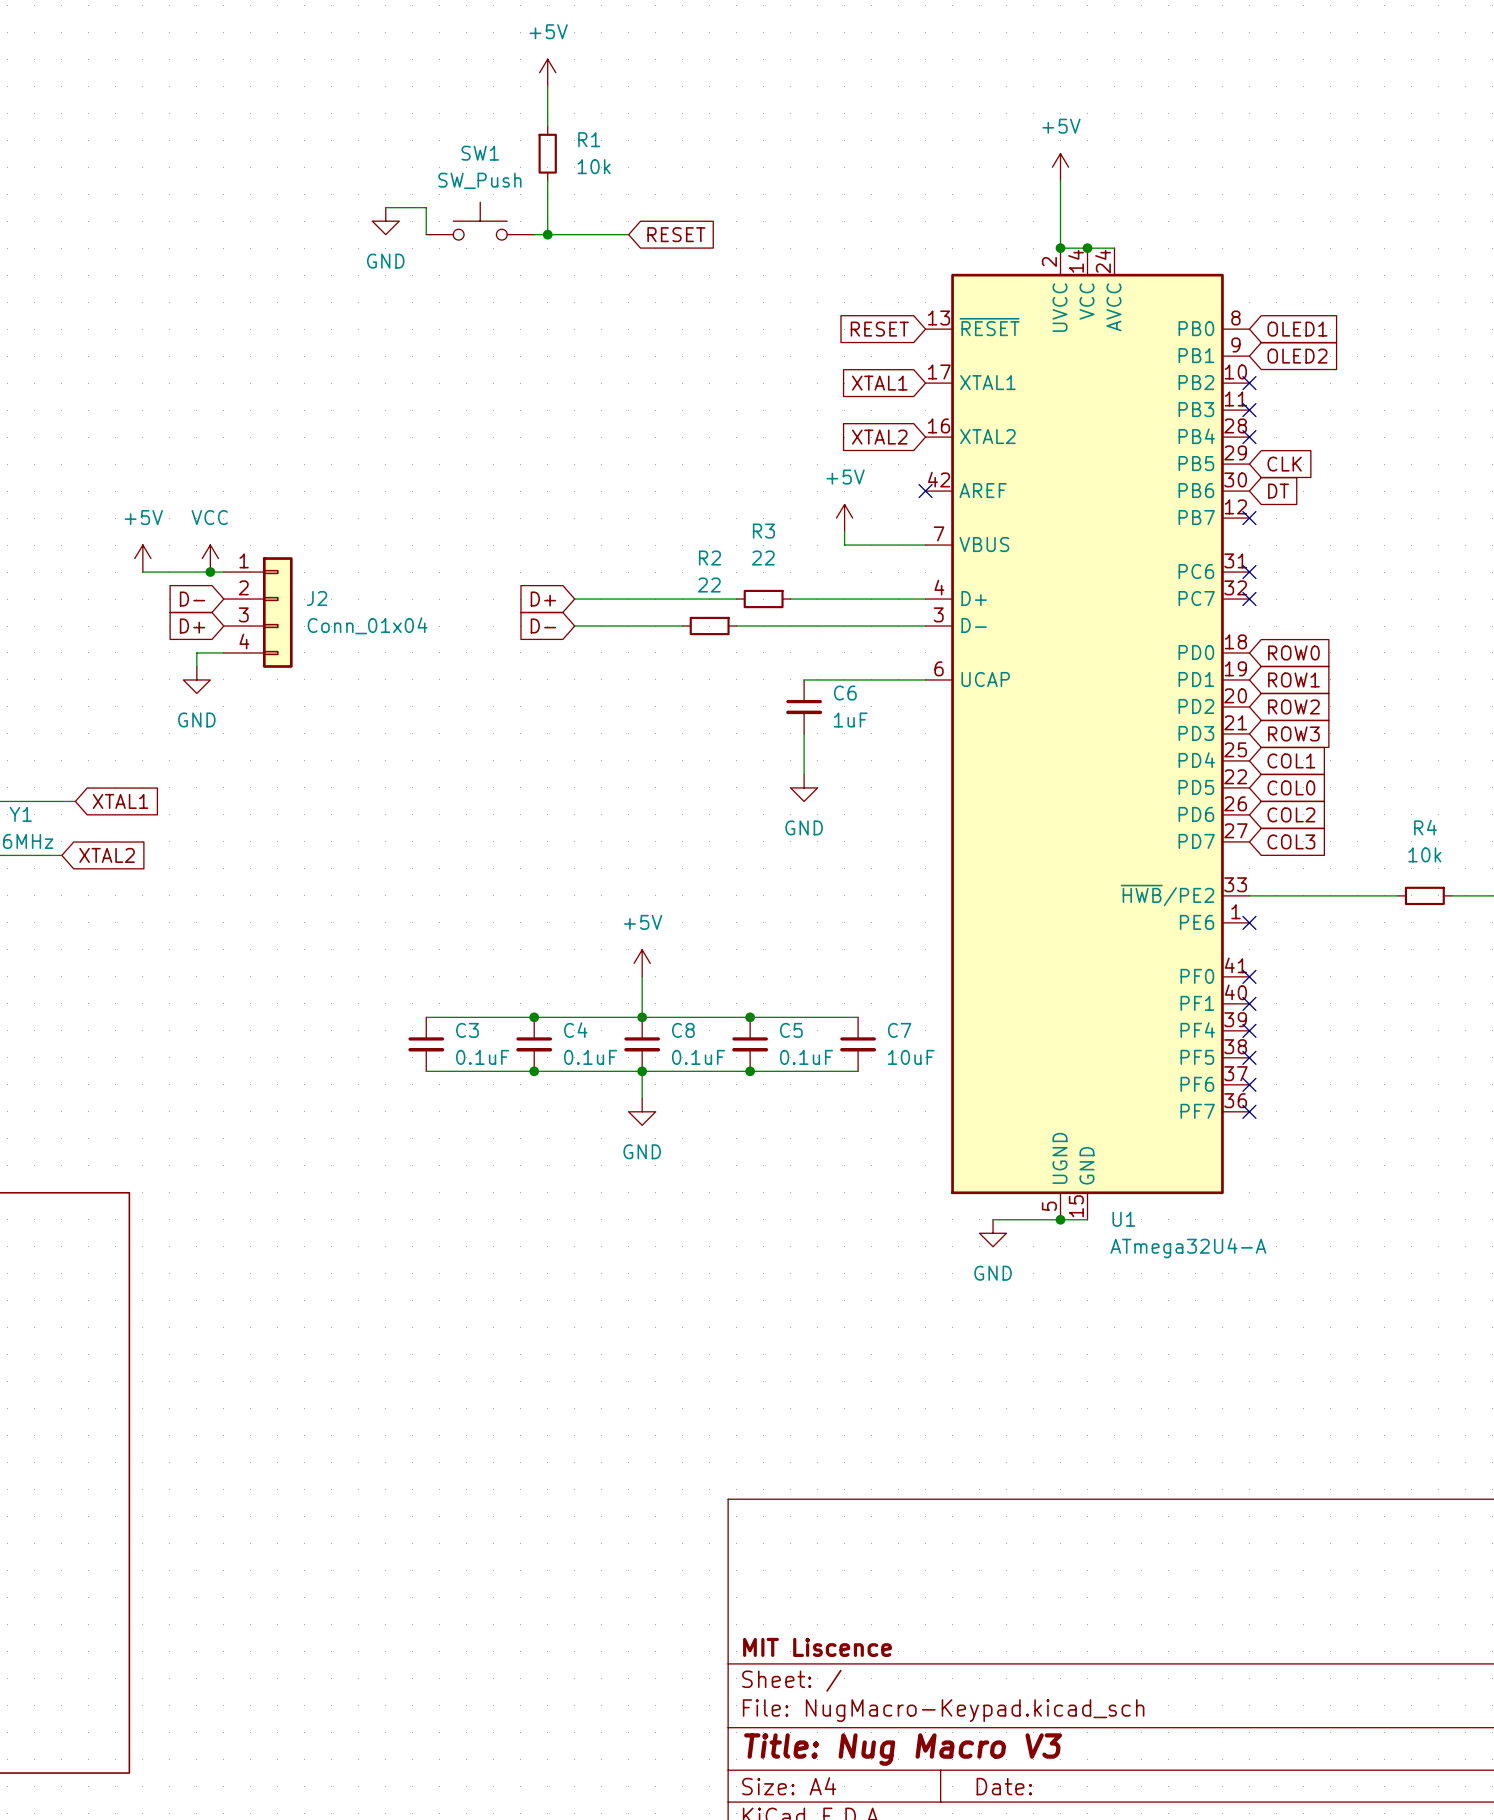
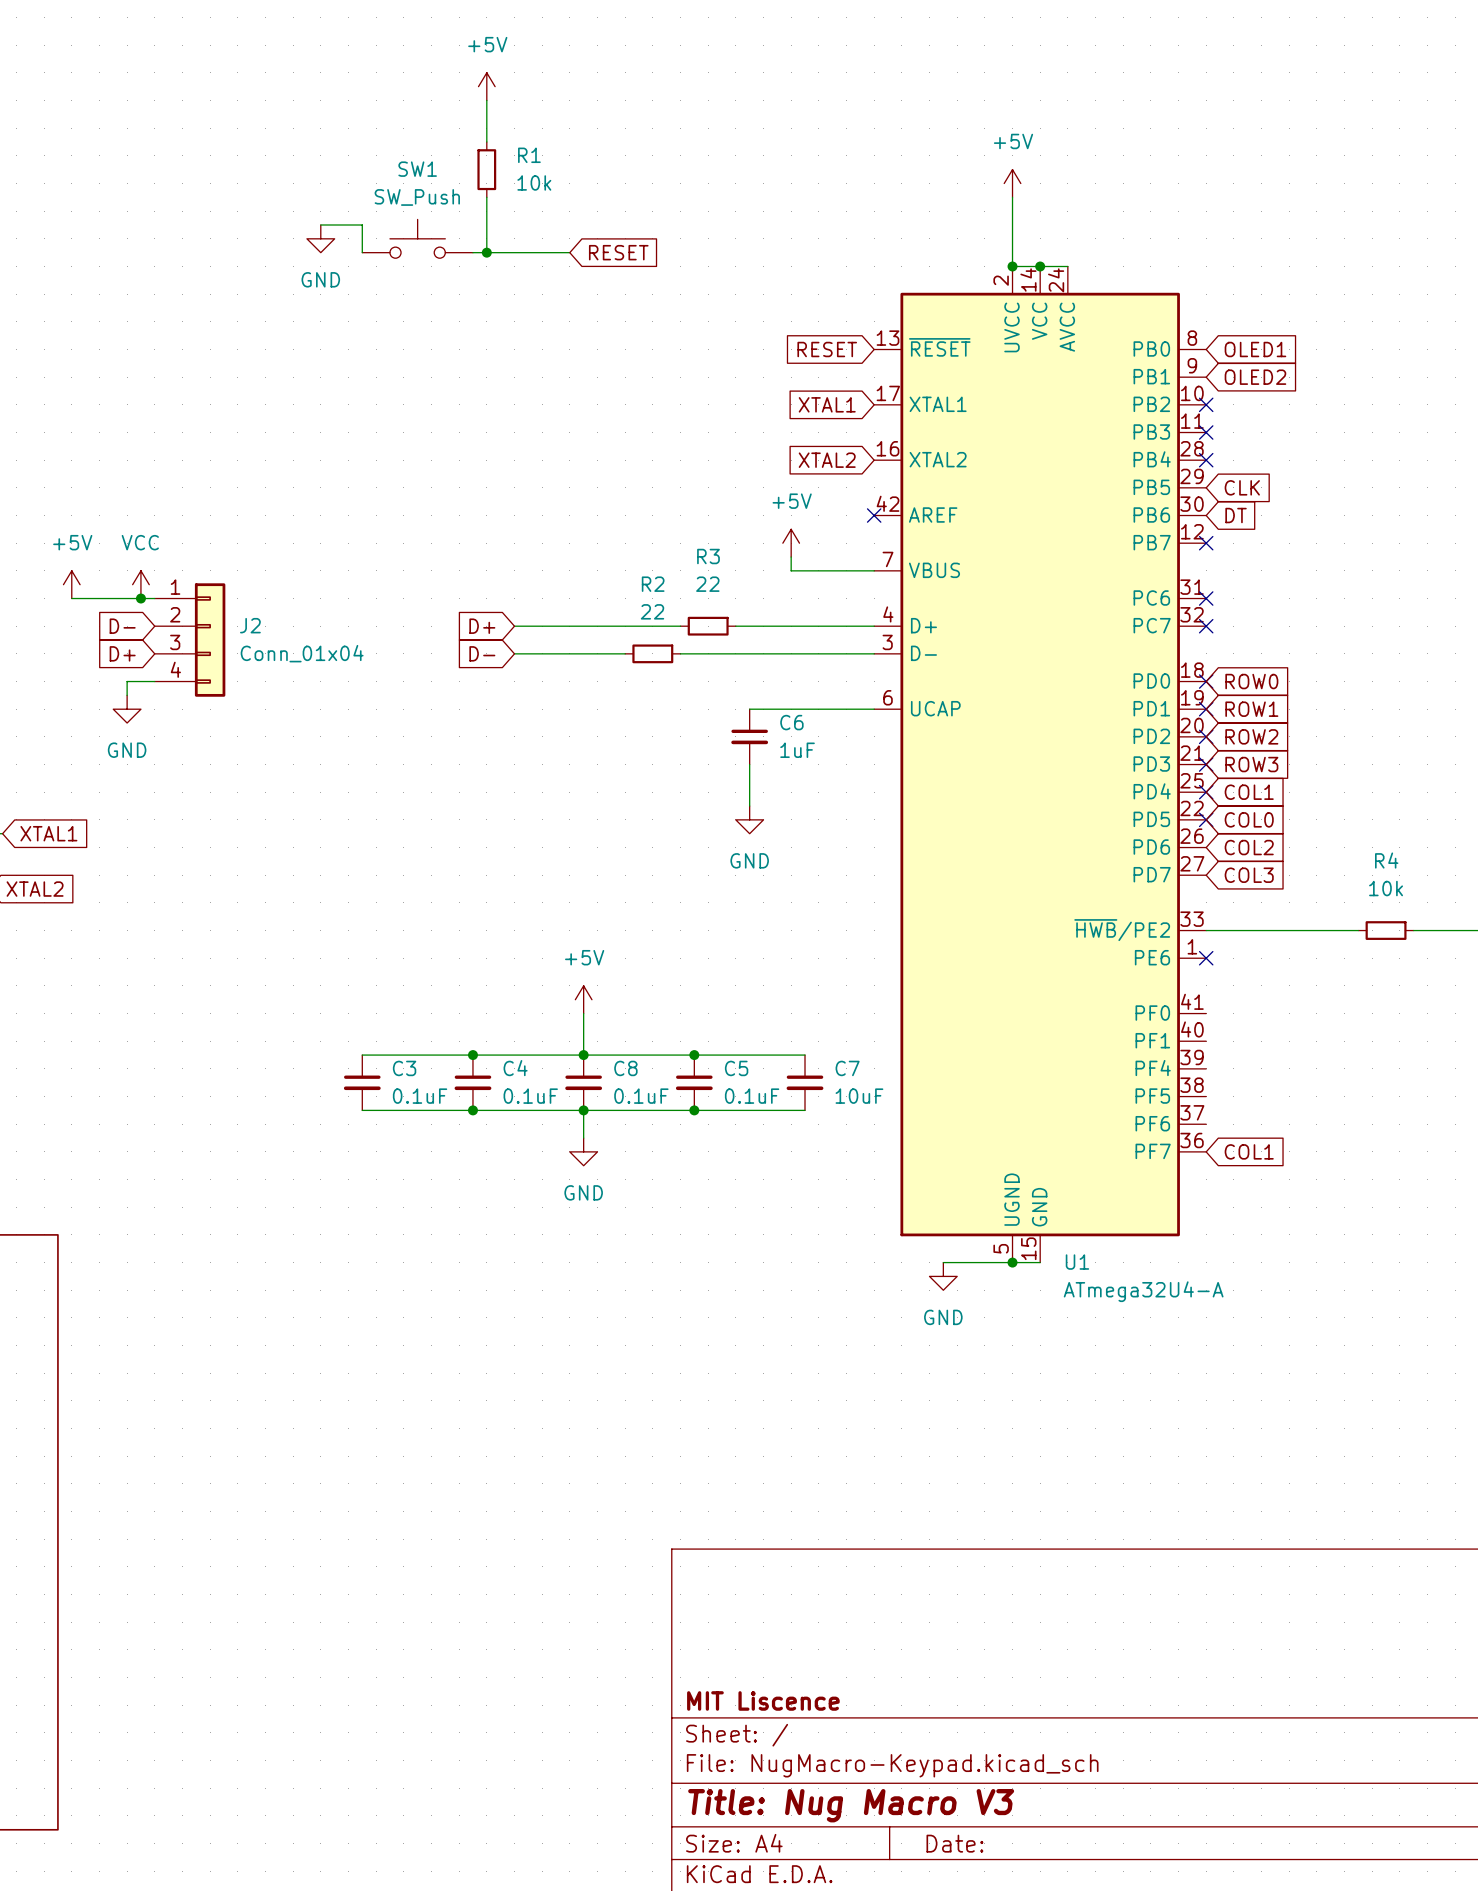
no-connect mark: none -> (1206, 681)
no-connect mark: none -> (1206, 709)
no-connect mark: none -> (1206, 736)
no-connect mark: none -> (1206, 764)
no-connect mark: none -> (1206, 792)
no-connect mark: none -> (1206, 819)
no-connect mark: (1249, 976) -> none
no-connect mark: (1249, 1003) -> none
no-connect mark: (1249, 1030) -> none
no-connect mark: (1249, 1057) -> none
no-connect mark: (1249, 1084) -> none
no-connect mark: (1249, 1111) -> none
global label: none -> COL1 (1249, 1151)

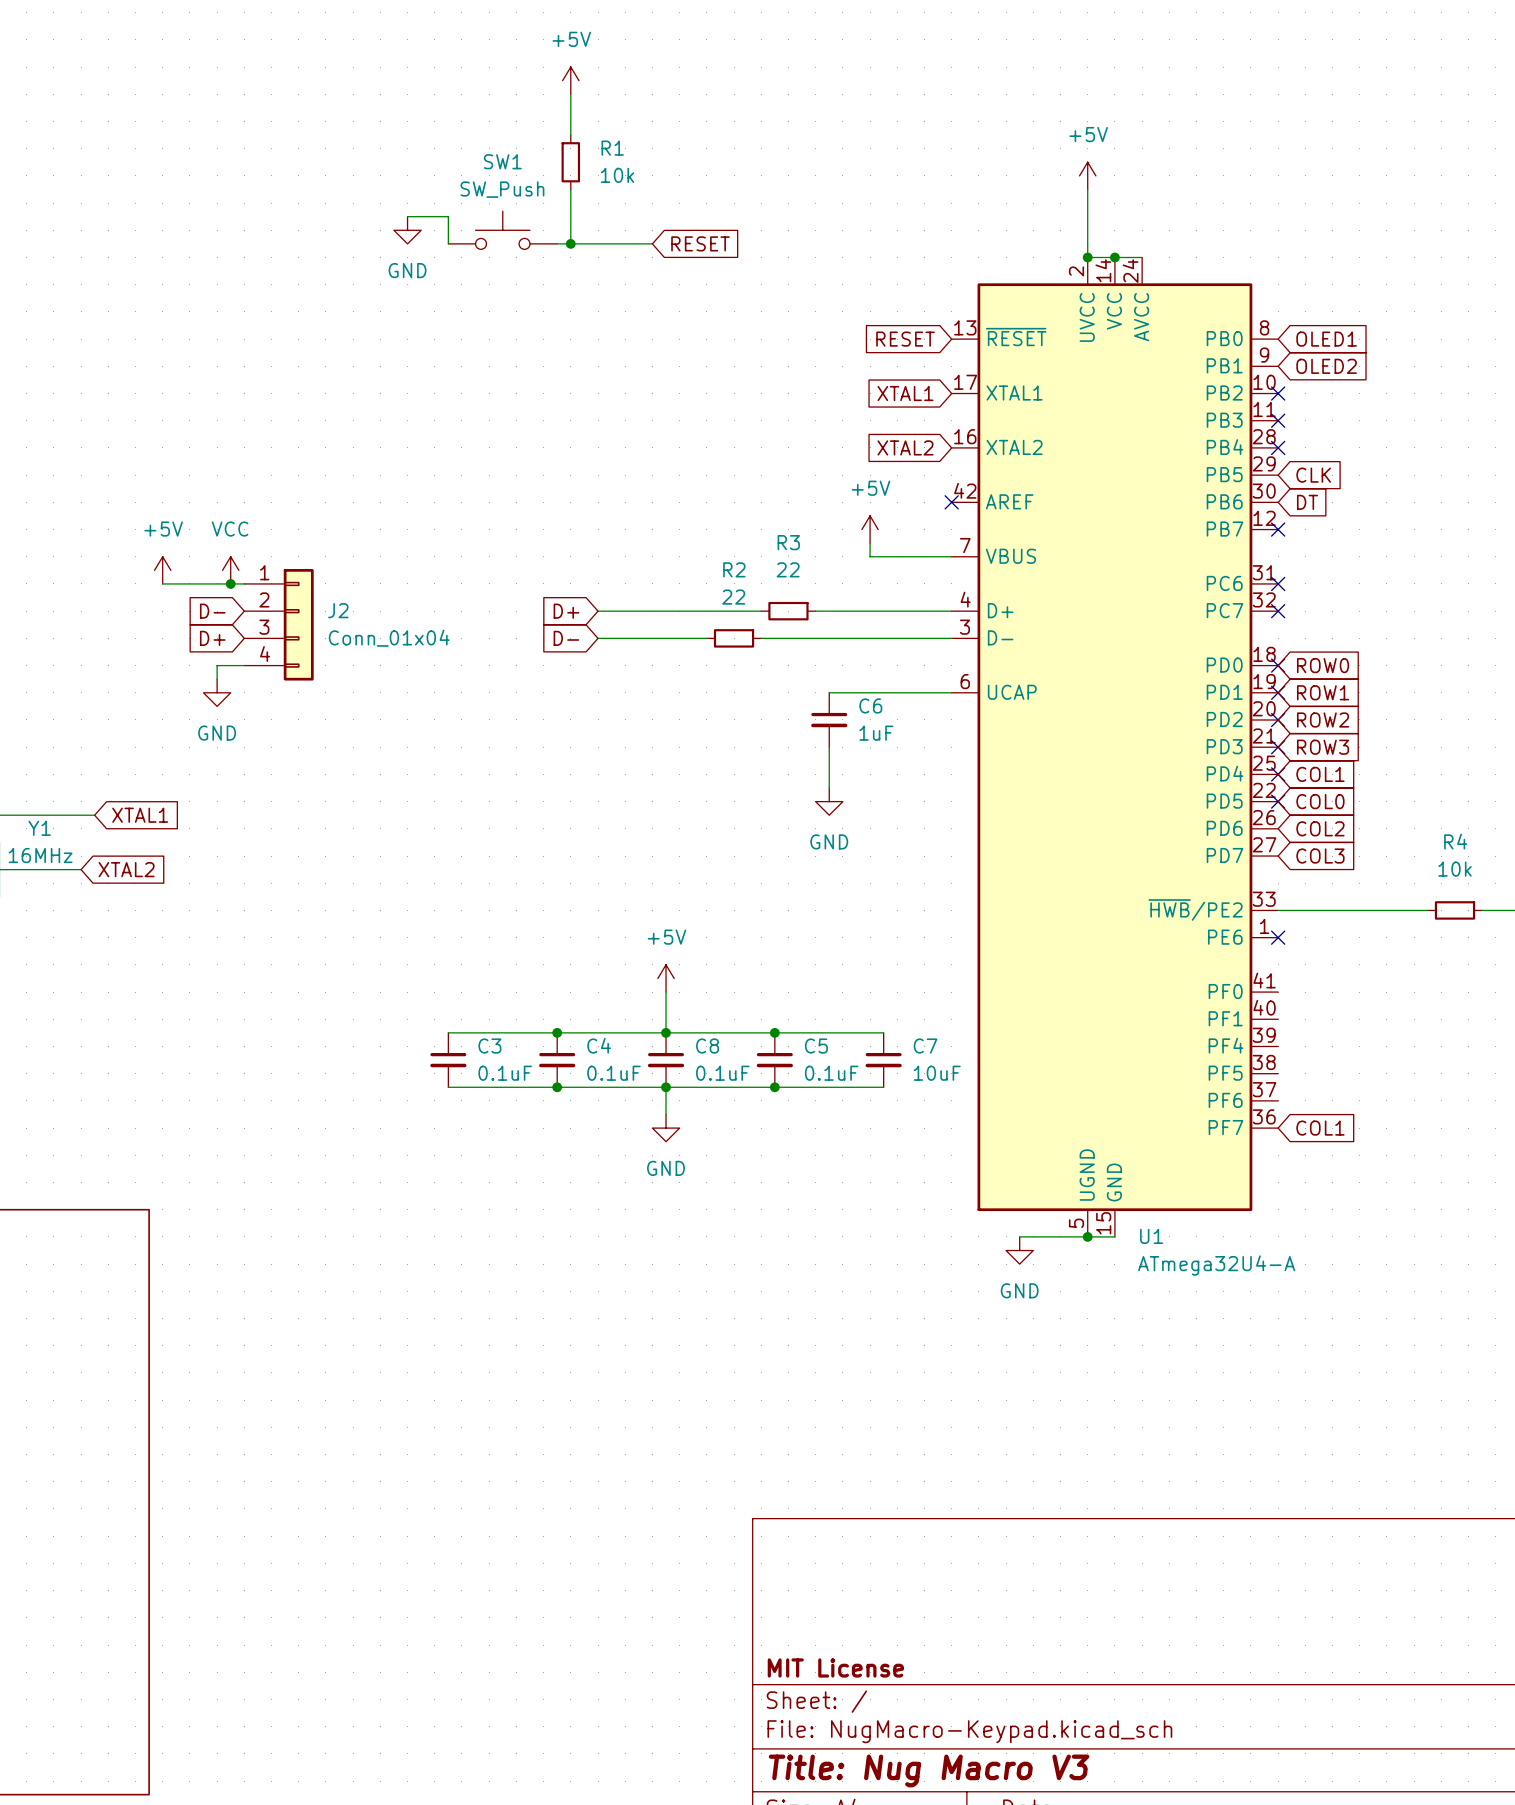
title block: MIT Liscence (763, 1700) -> MIT License (835, 1667)

